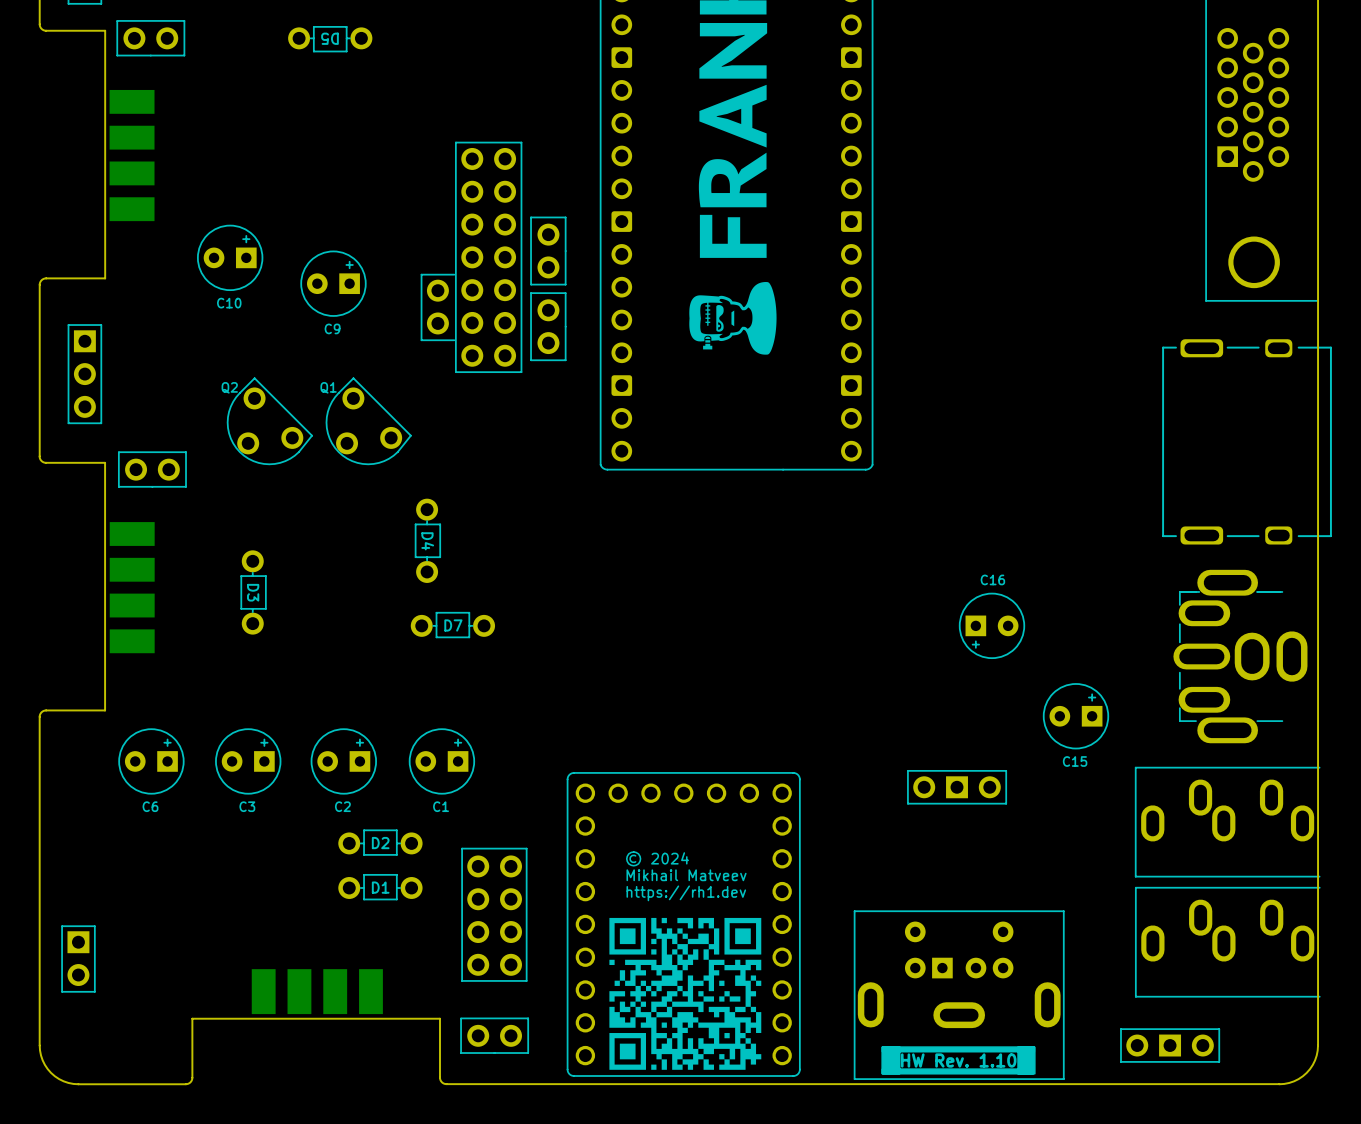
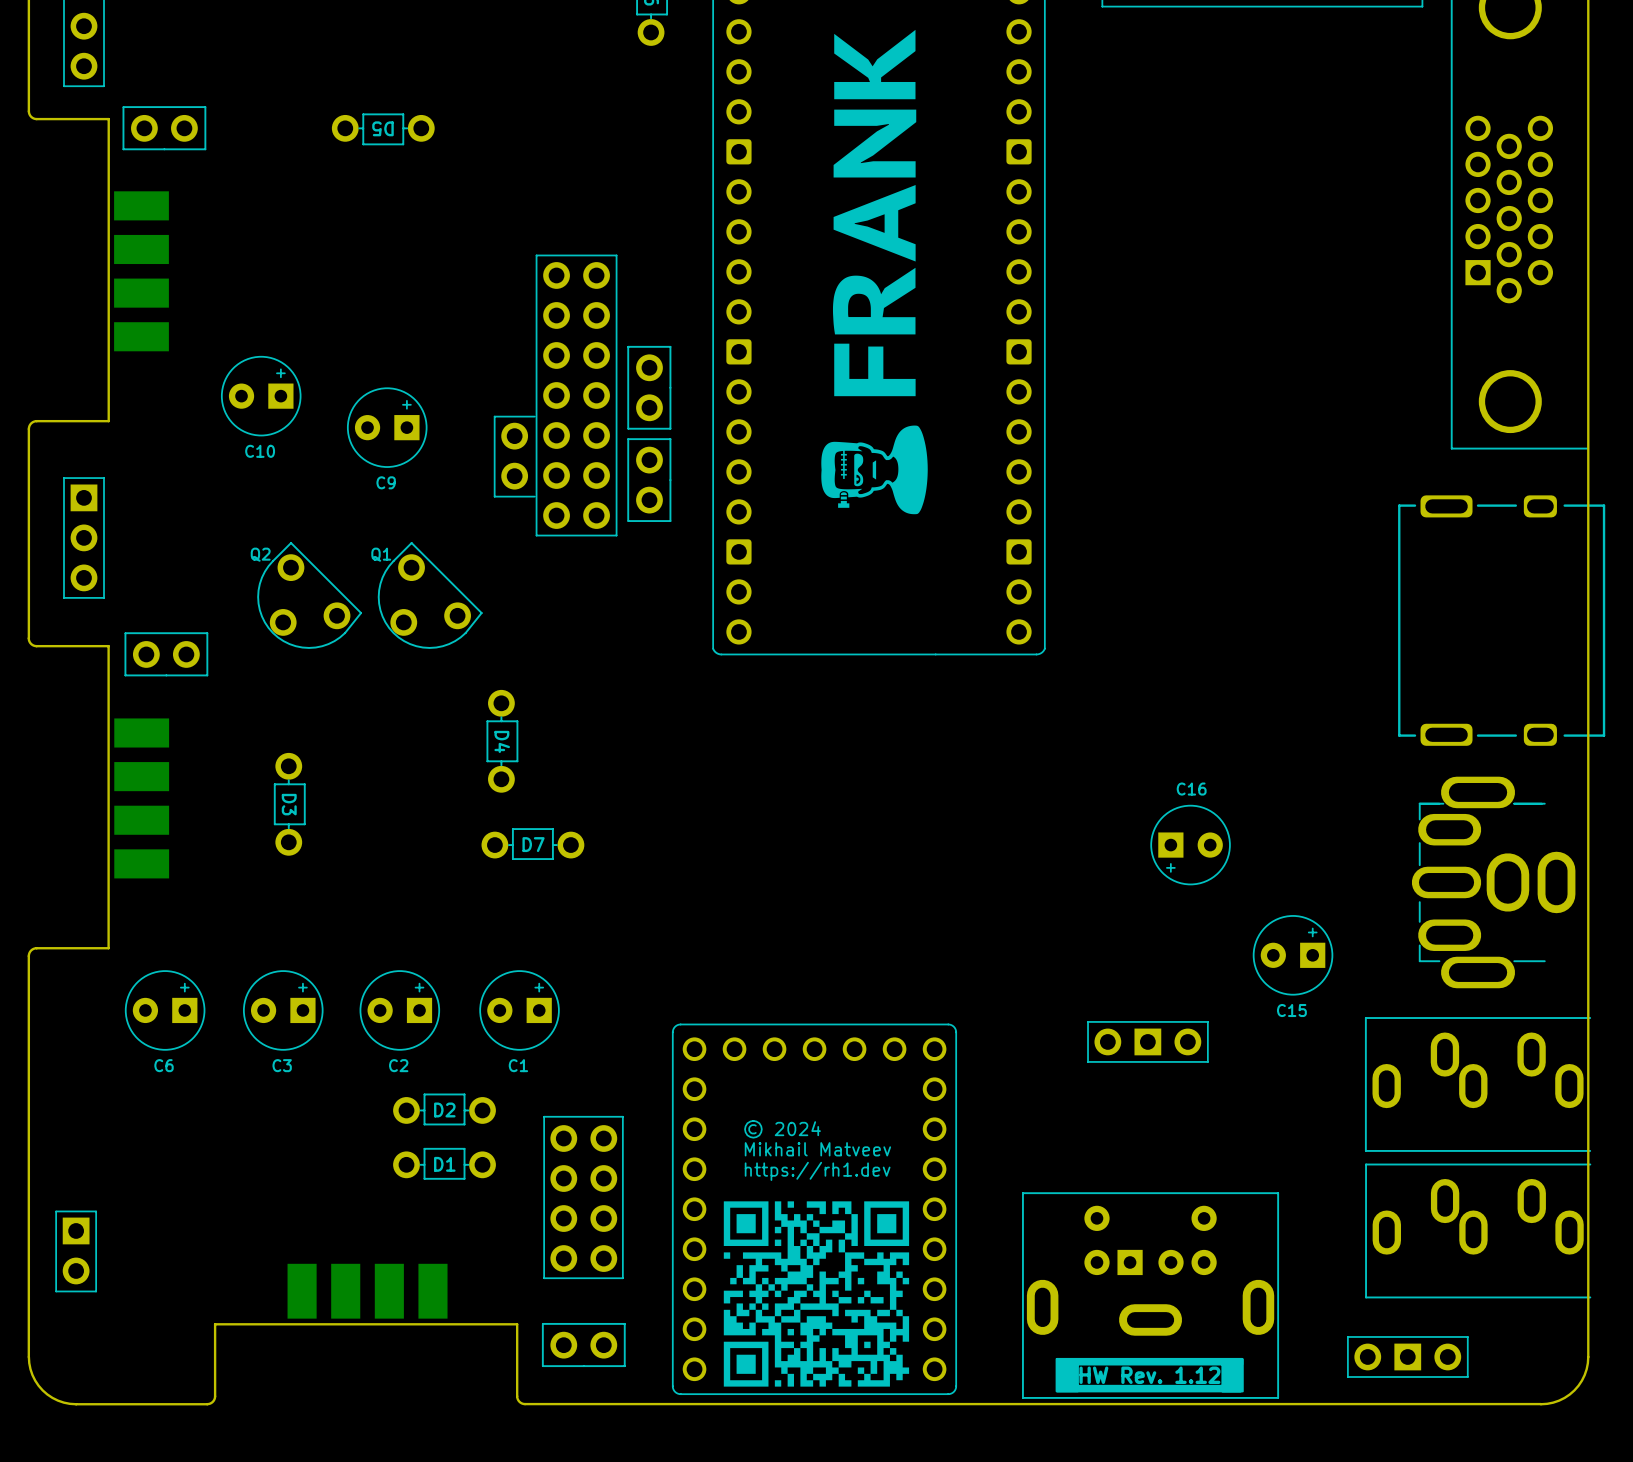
text: HW Rev. 1.10 (958, 1060) -> HW Rev. 1.12 (1149, 1375)

